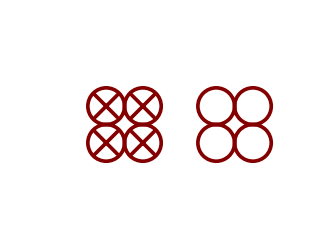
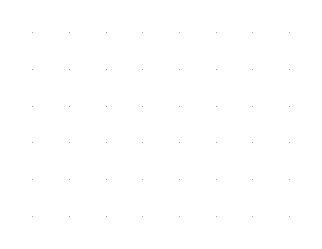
part: (106, 106) -> none
part: (142, 106) -> none
part: (216, 106) -> none
part: (252, 106) -> none
part: (106, 142) -> none
part: (142, 142) -> none
part: (216, 142) -> none
part: (252, 142) -> none

